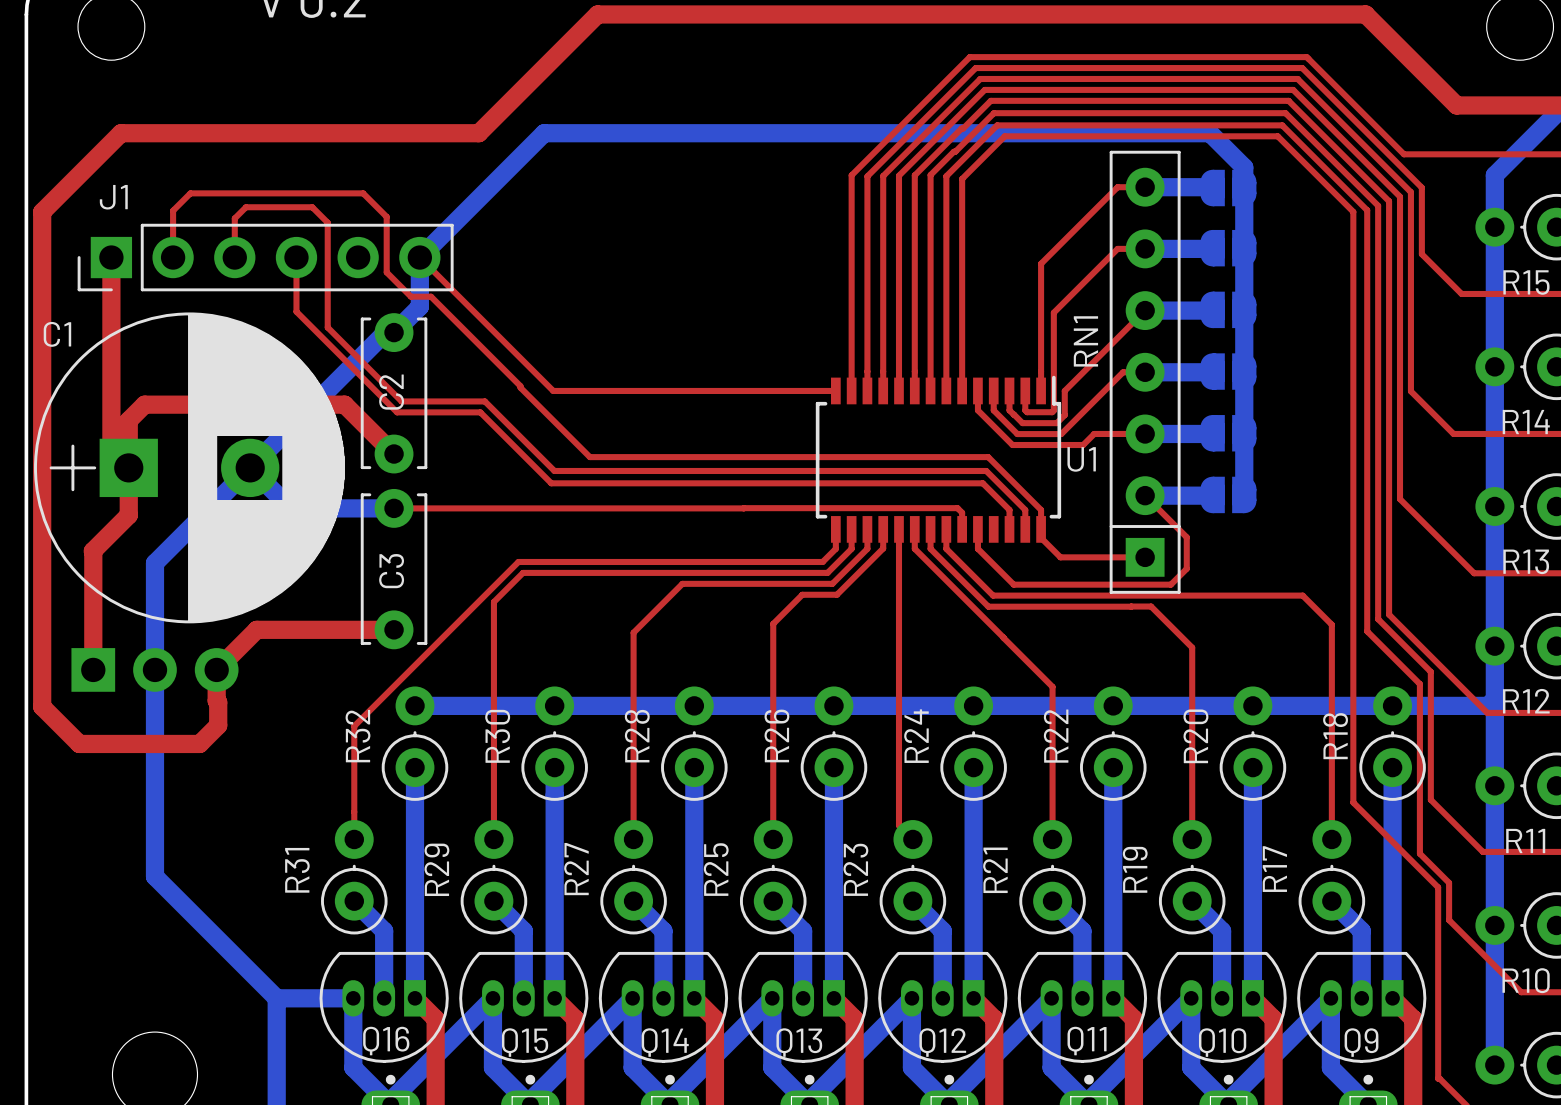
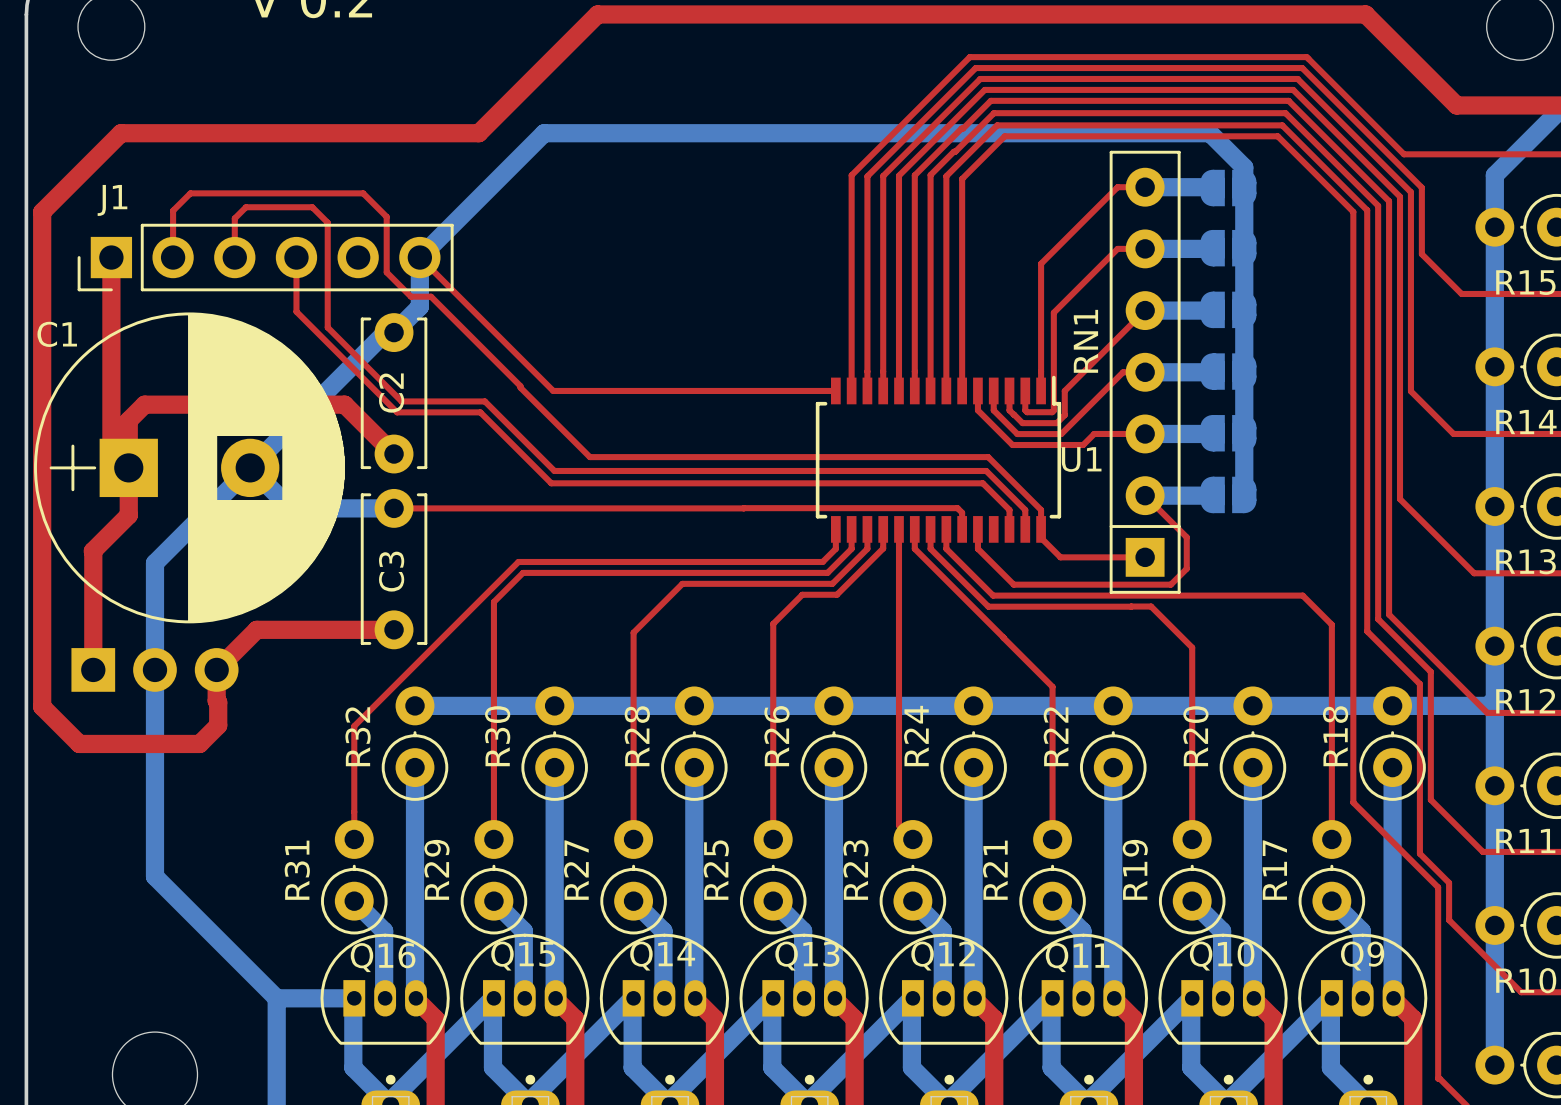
Q16 rotation: 0° (384, 1007) -> 180° (385, 989)
Q15 rotation: 0° (523, 1007) -> 180° (524, 989)
Q14 rotation: 0° (663, 1007) -> 180° (664, 989)
Q13 rotation: 0° (803, 1007) -> 180° (804, 989)
Q12 rotation: 0° (942, 1007) -> 180° (943, 989)
Q11 rotation: 0° (1082, 1007) -> 180° (1083, 989)
Q10 rotation: 0° (1222, 1007) -> 180° (1223, 989)
Q9 rotation: 0° (1361, 1007) -> 180° (1362, 989)

